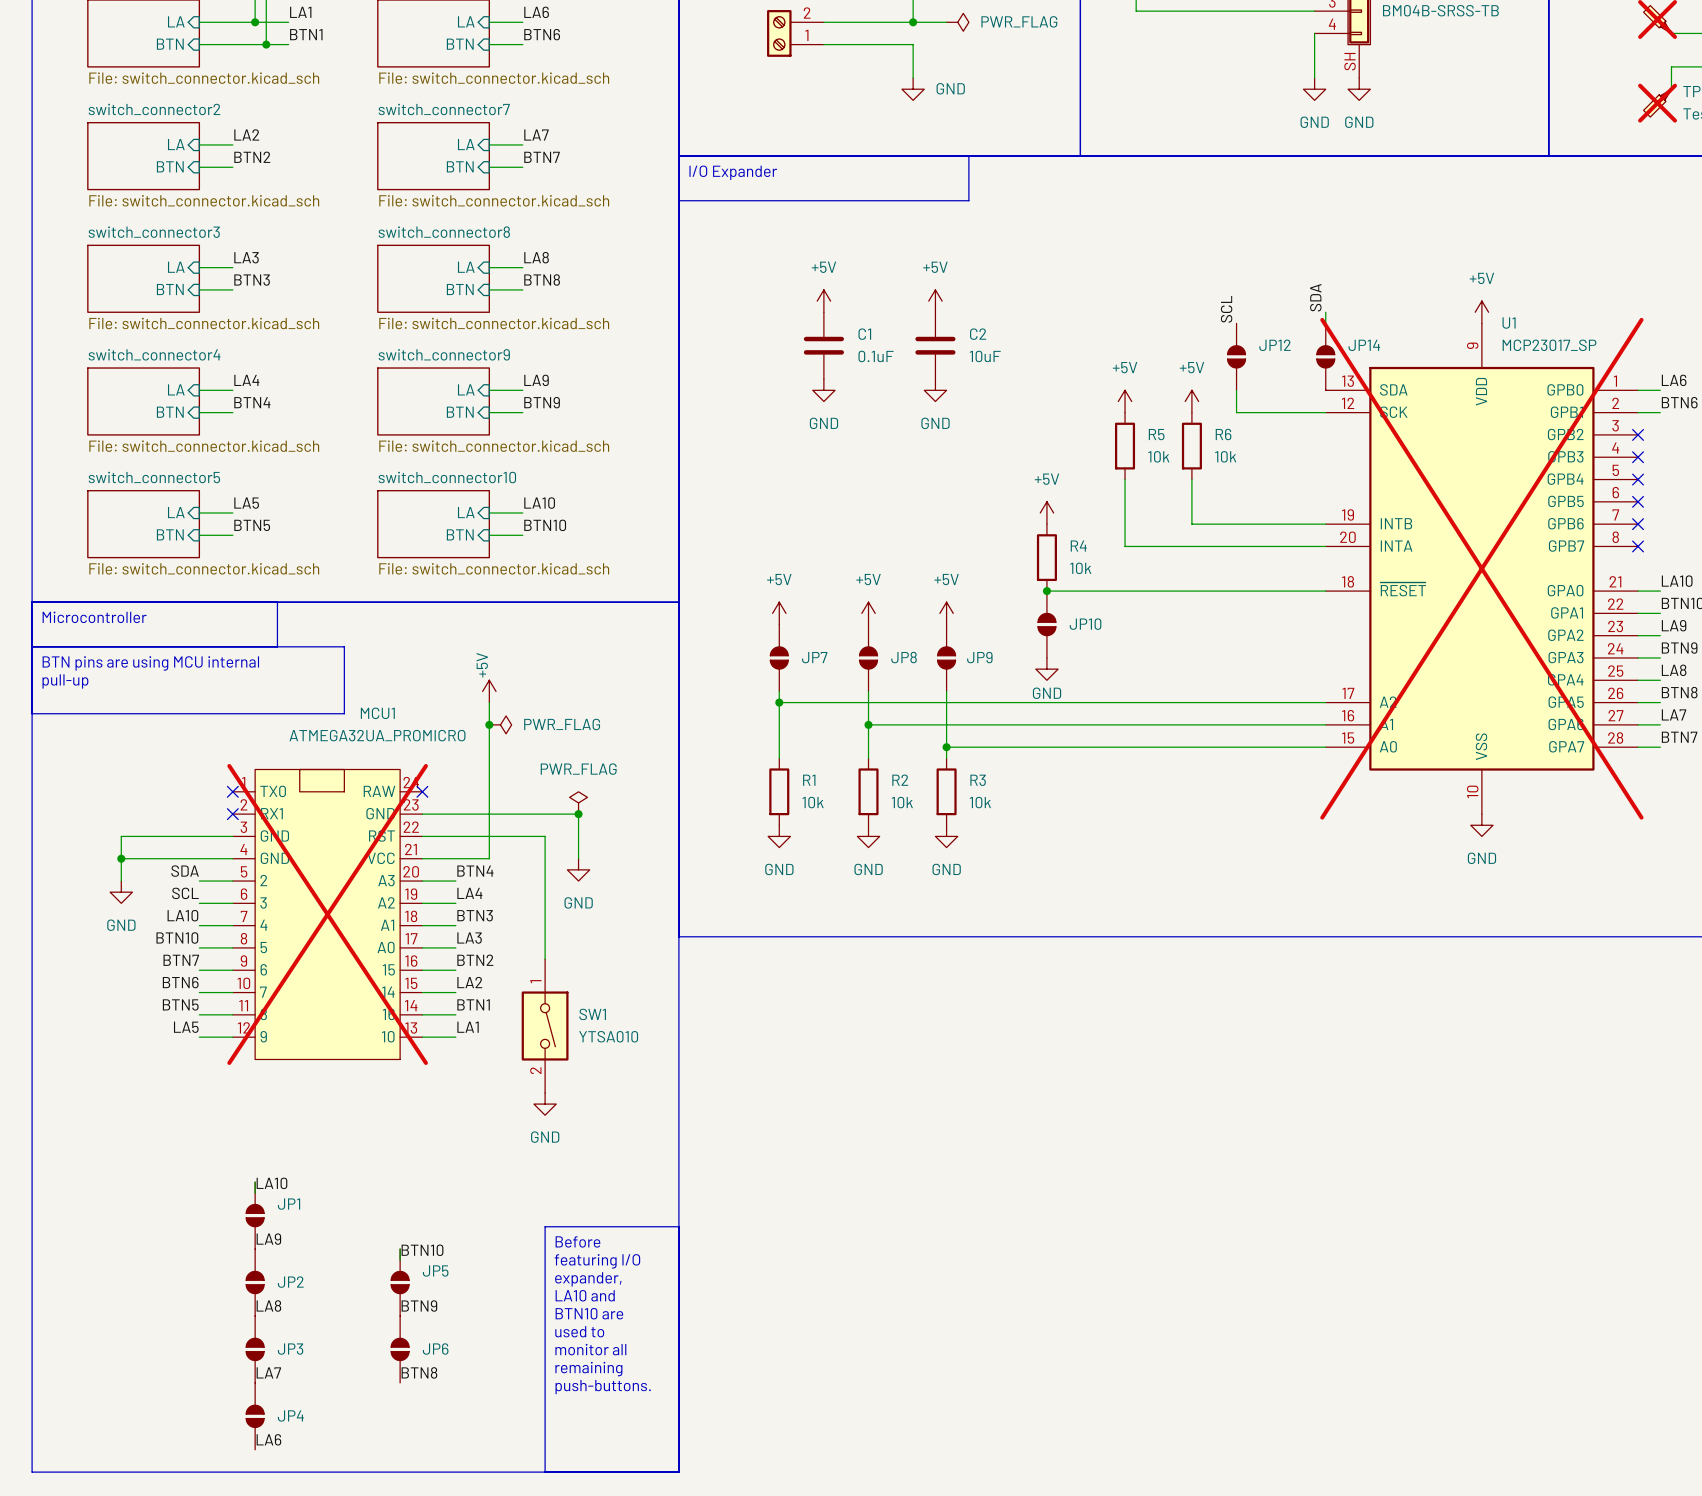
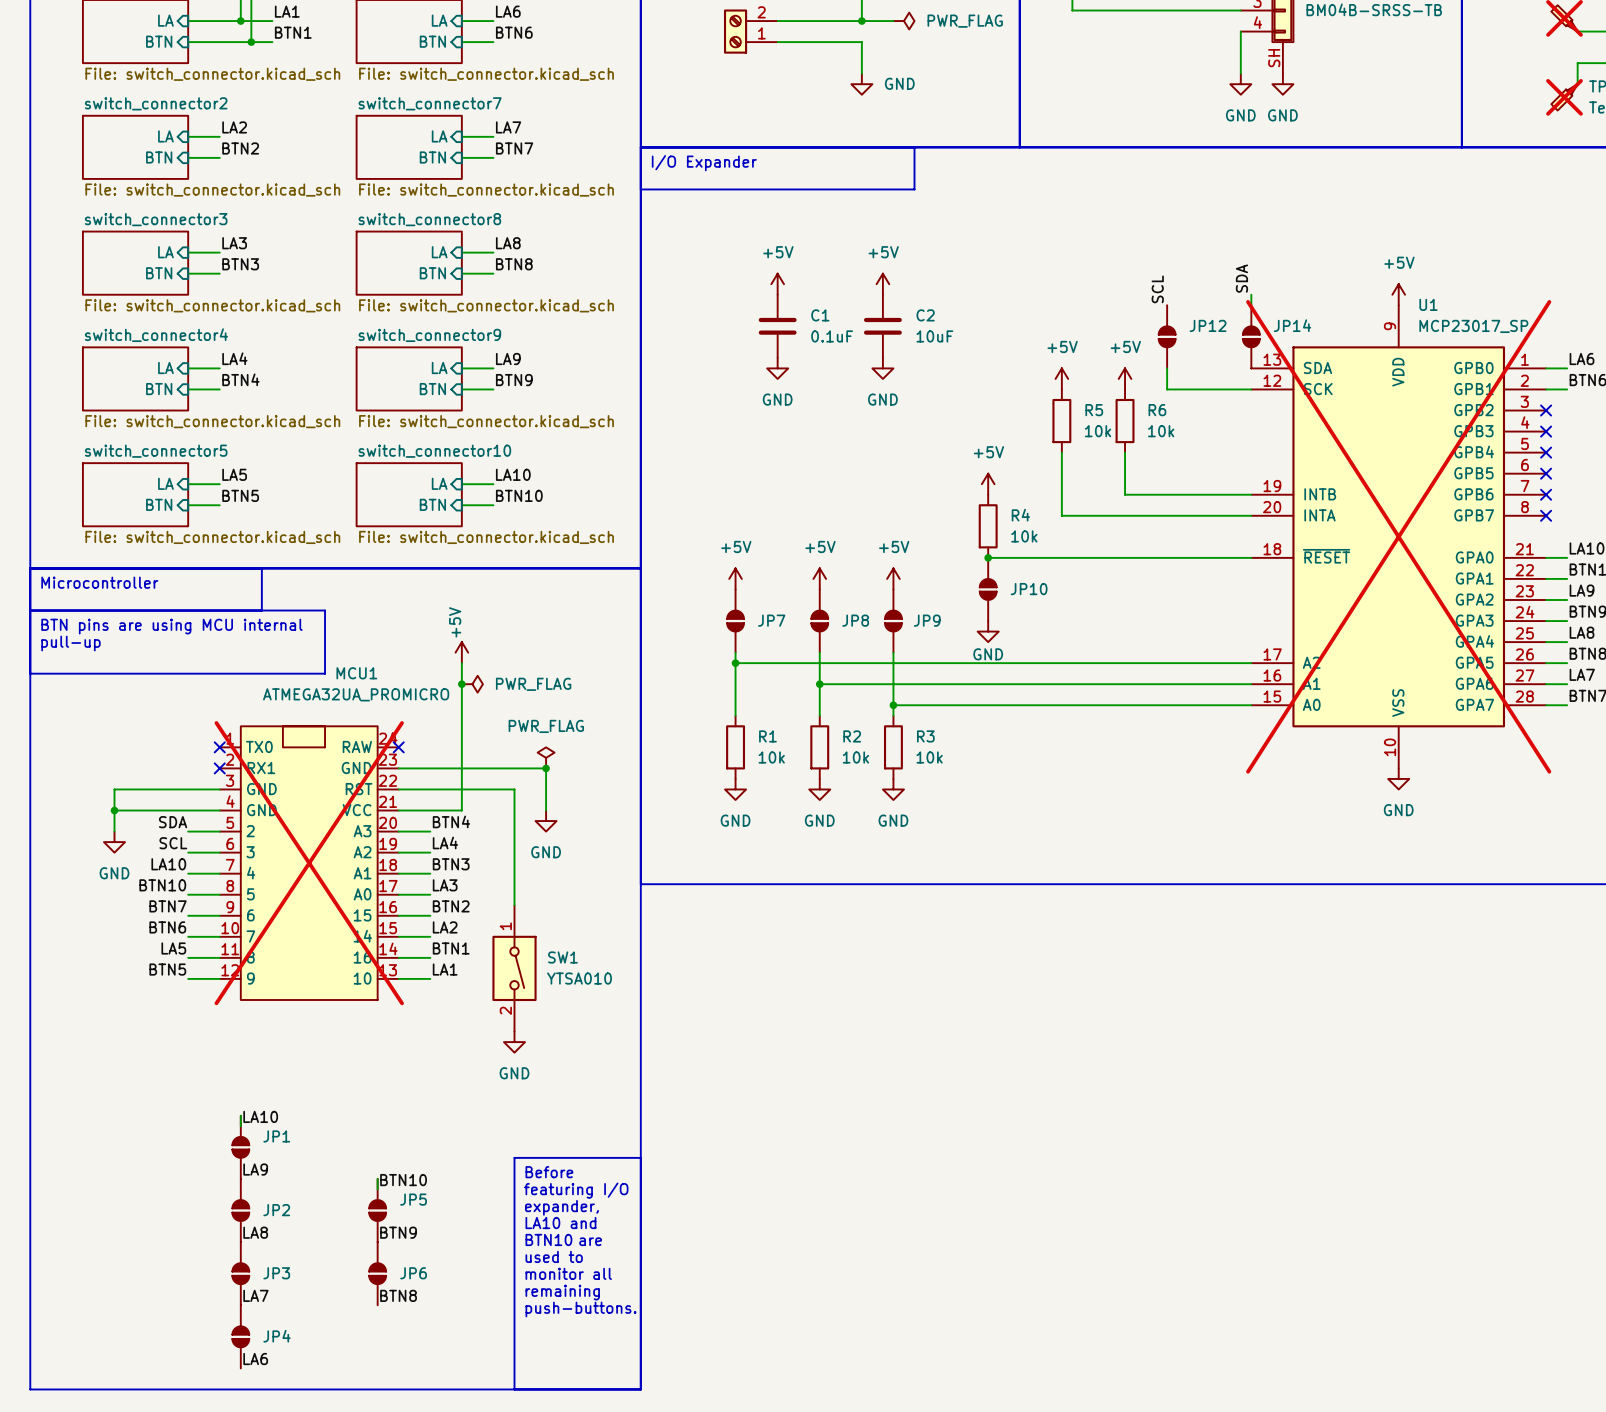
label: BTN5 (180, 1004) -> LA5 (173, 948)
label: LA5 (186, 1027) -> BTN5 (167, 969)

